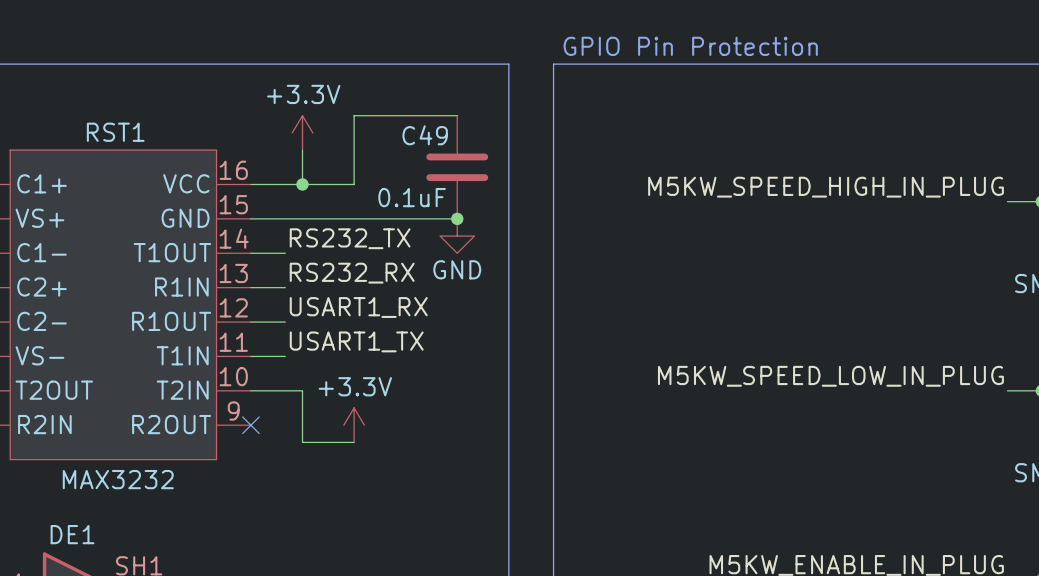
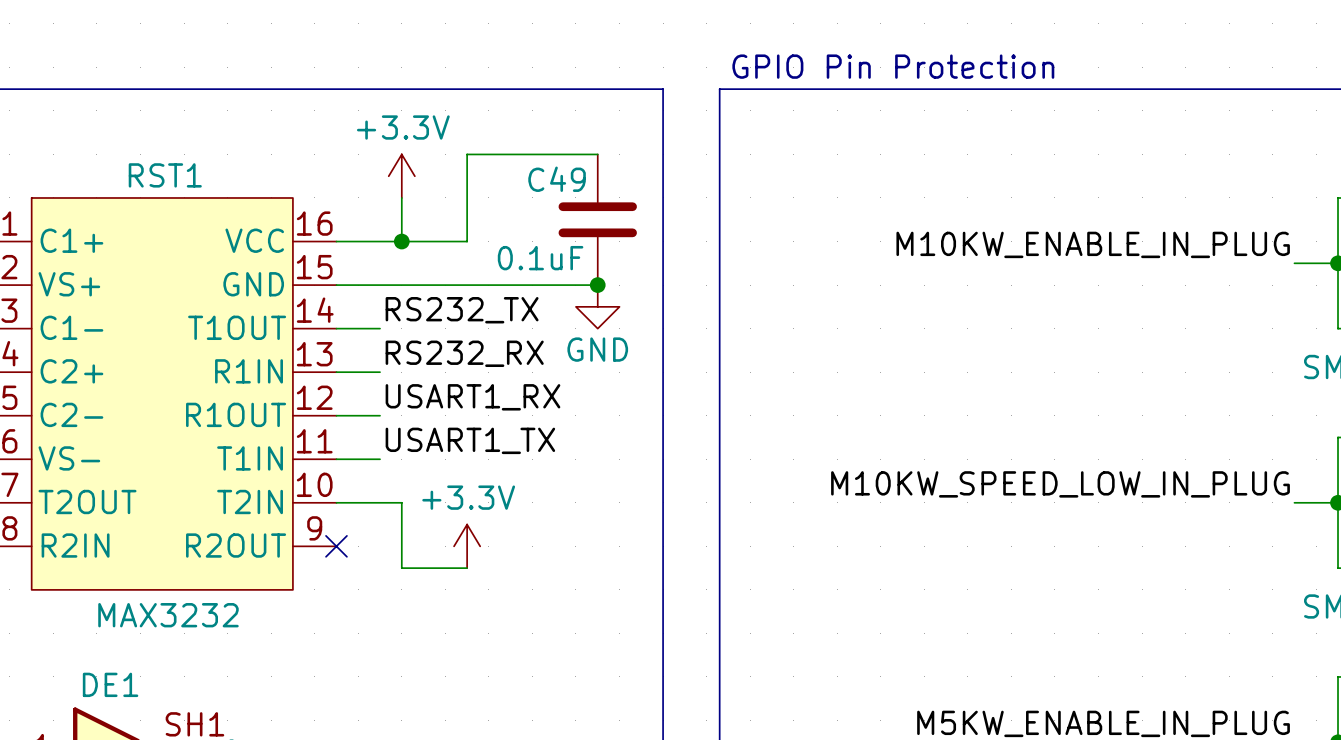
label: M5KW_SPEED_HIGH_IN_PLUG (826, 187) -> M10KW_ENABLE_IN_PLUG (1093, 244)
label: M5KW_SPEED_LOW_IN_PLUG (830, 376) -> M10KW_SPEED_LOW_IN_PLUG (1060, 484)

